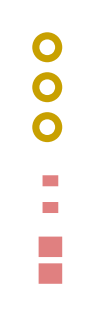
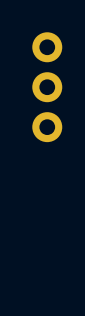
part: (50, 194) -> none
part: (50, 260) -> none

